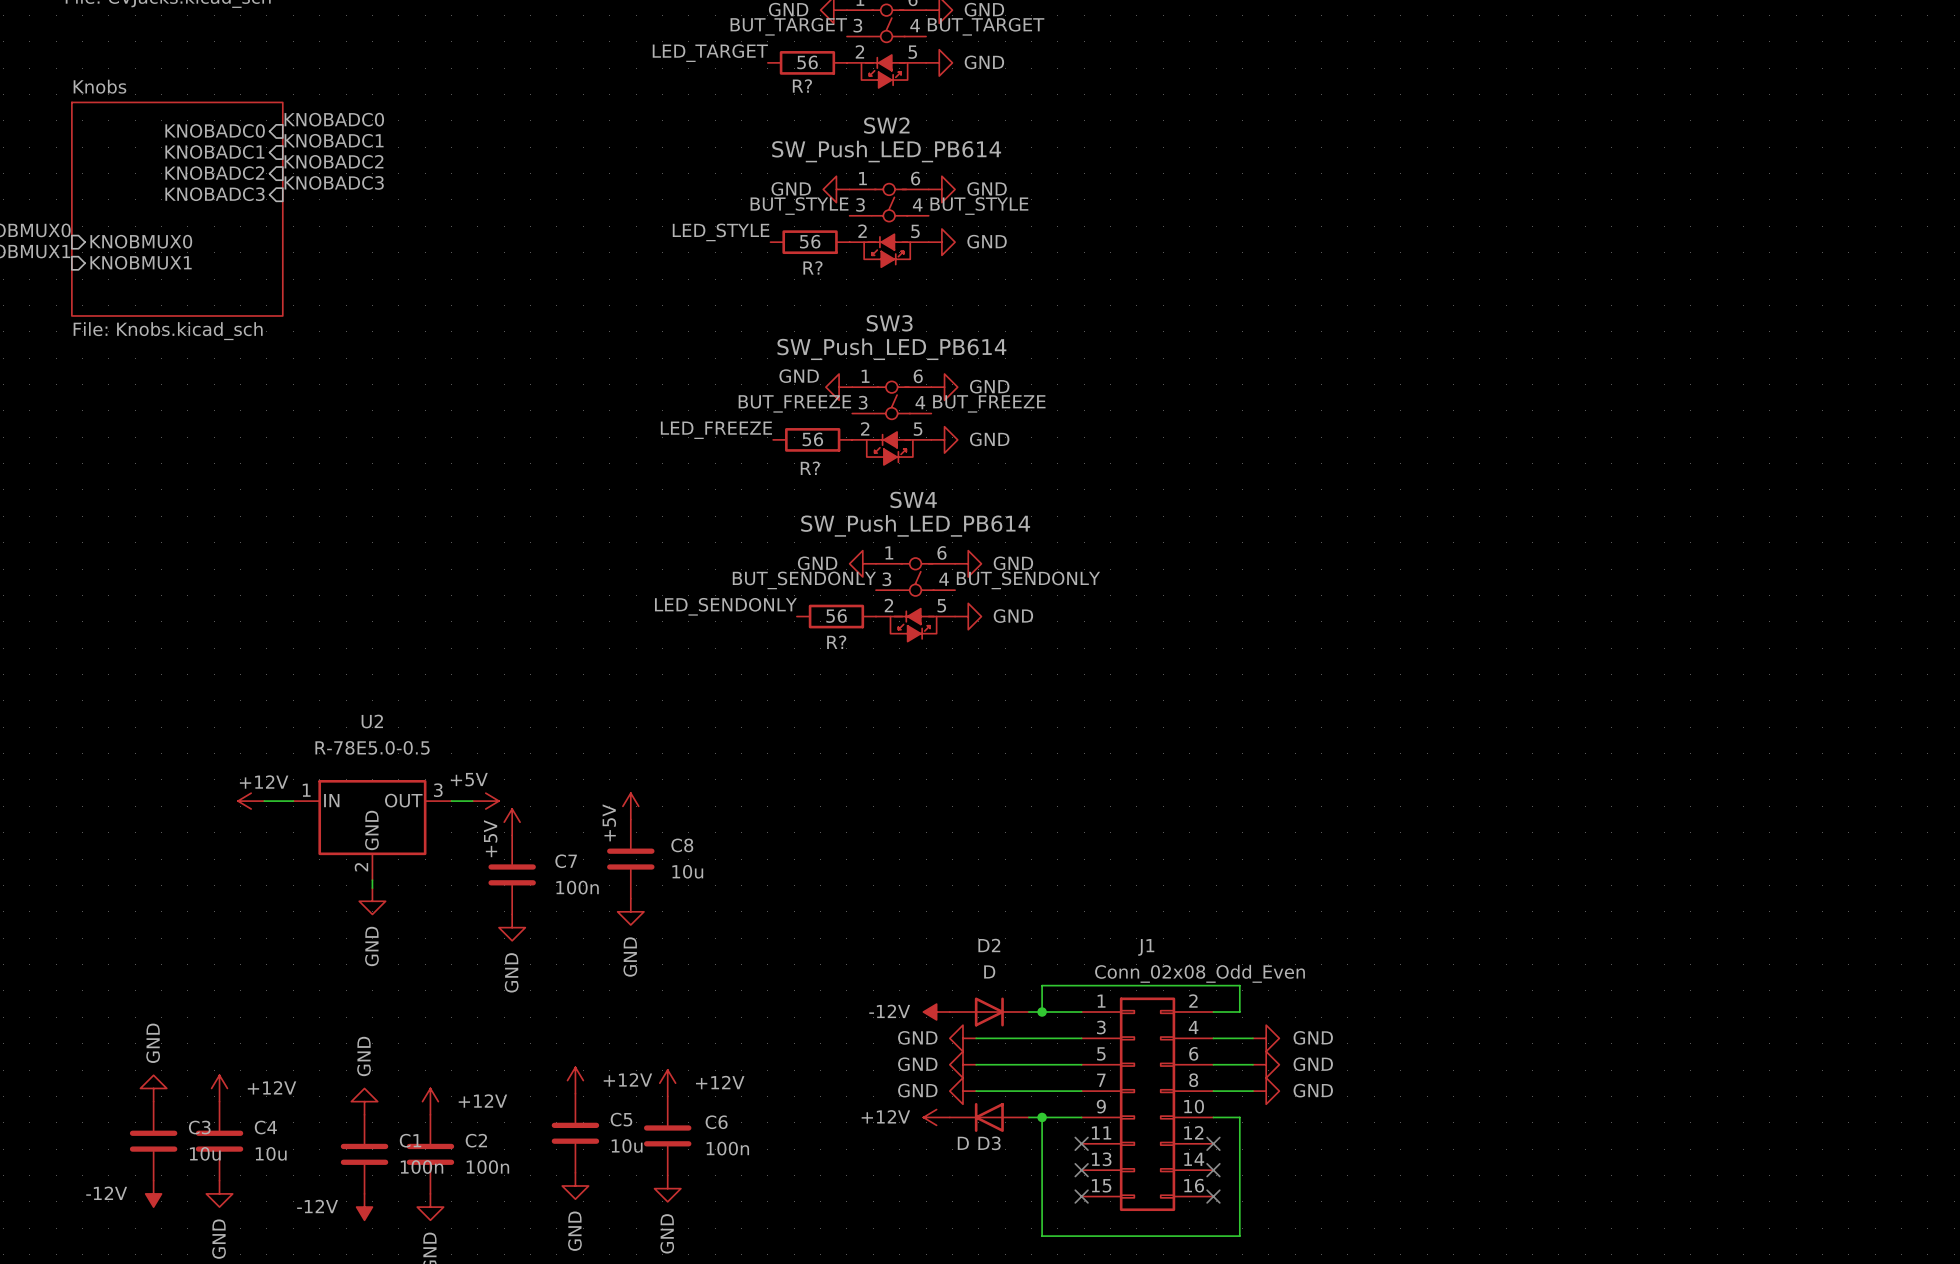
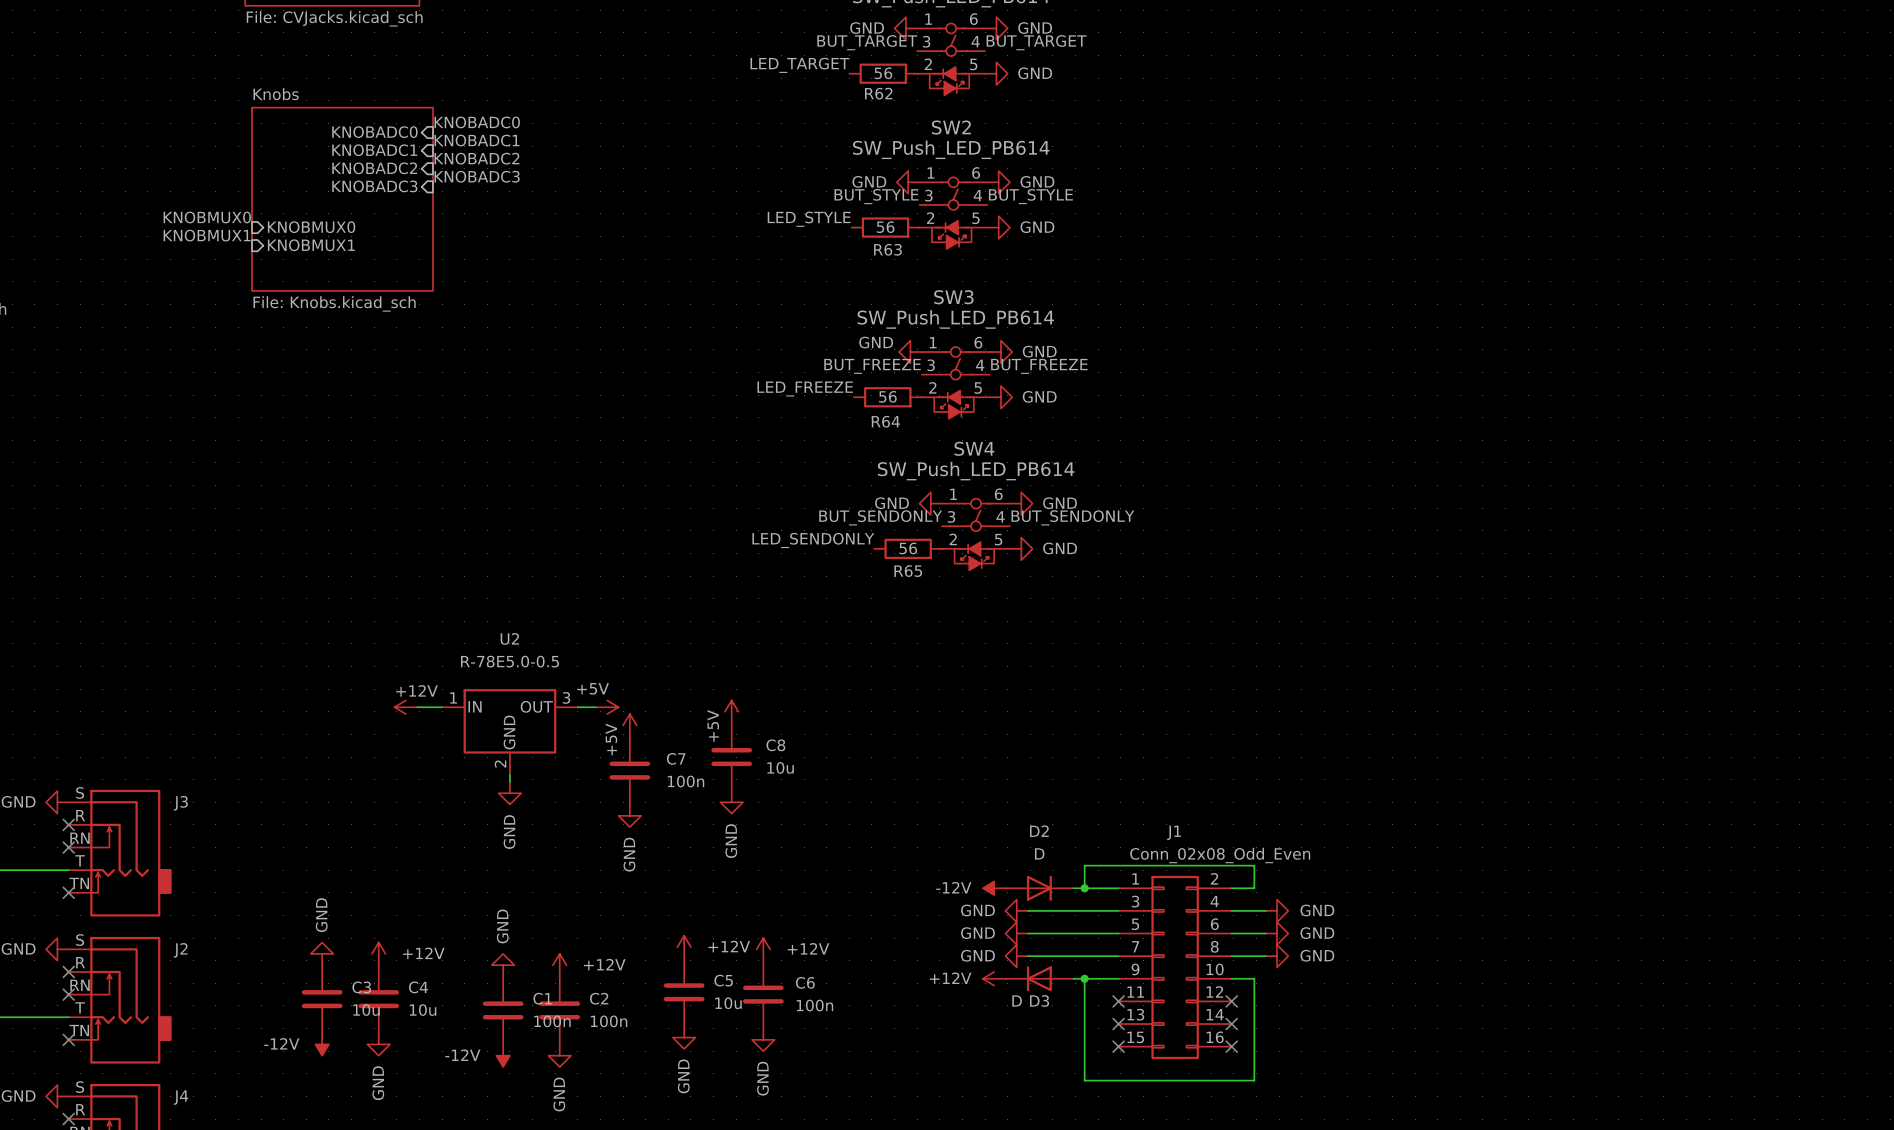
R? name: R? (802, 86) -> R62 (878, 93)
R? name: R? (812, 267) -> R63 (887, 249)
R? name: R? (810, 468) -> R64 (885, 421)
R? name: R? (836, 642) -> R65 (908, 571)

